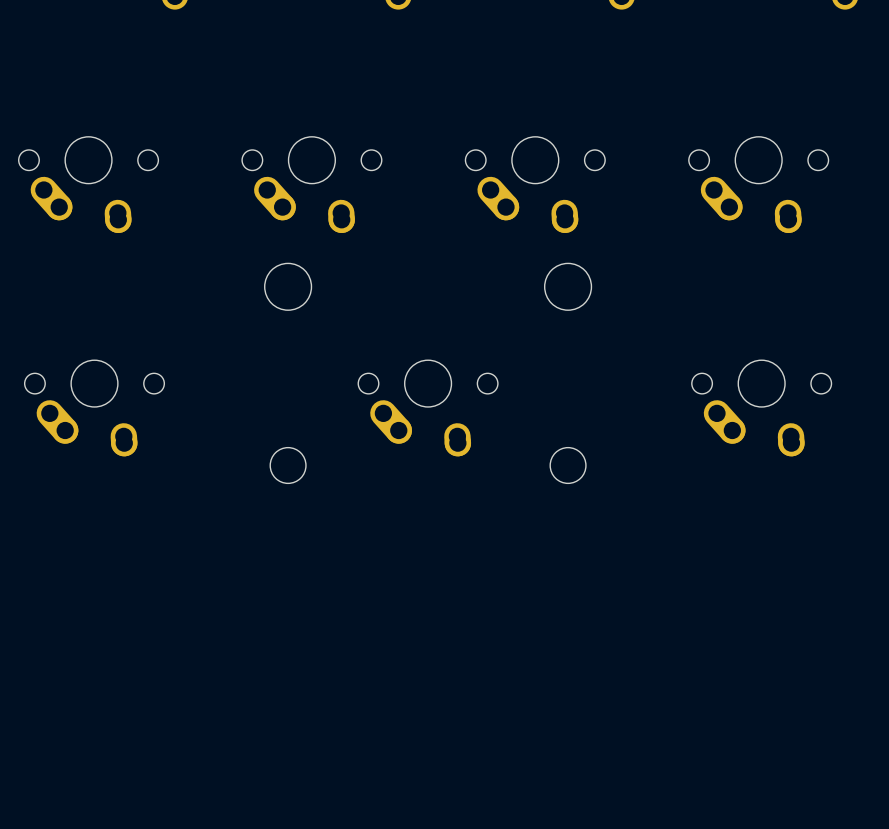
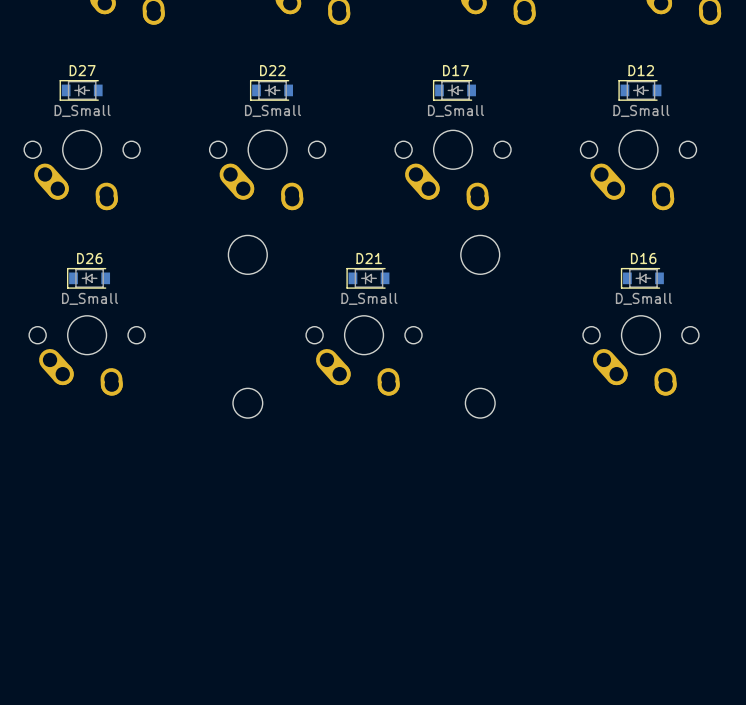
D27: none -> D_Small (81, 90)
D22: none -> D_Small (271, 90)
D17: none -> D_Small (454, 90)
D12: none -> D_Small (639, 90)
D26: none -> D_Small (88, 278)
D21: none -> D_Small (367, 278)
D16: none -> D_Small (642, 278)

